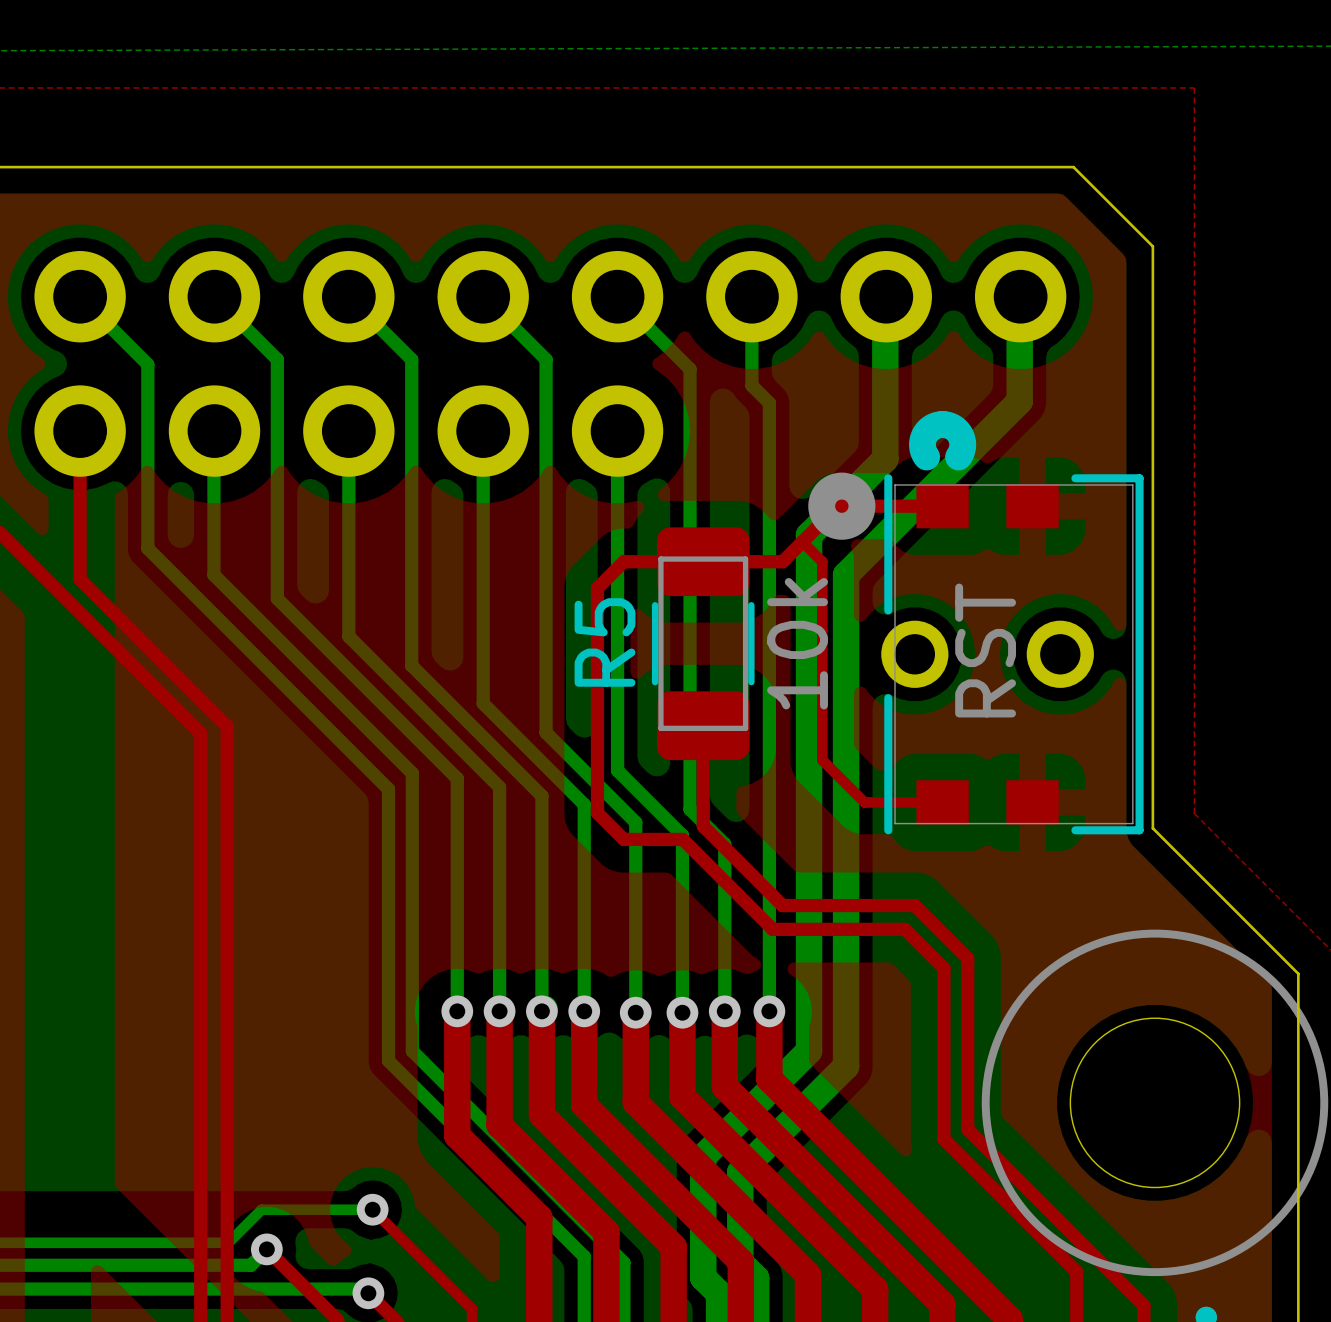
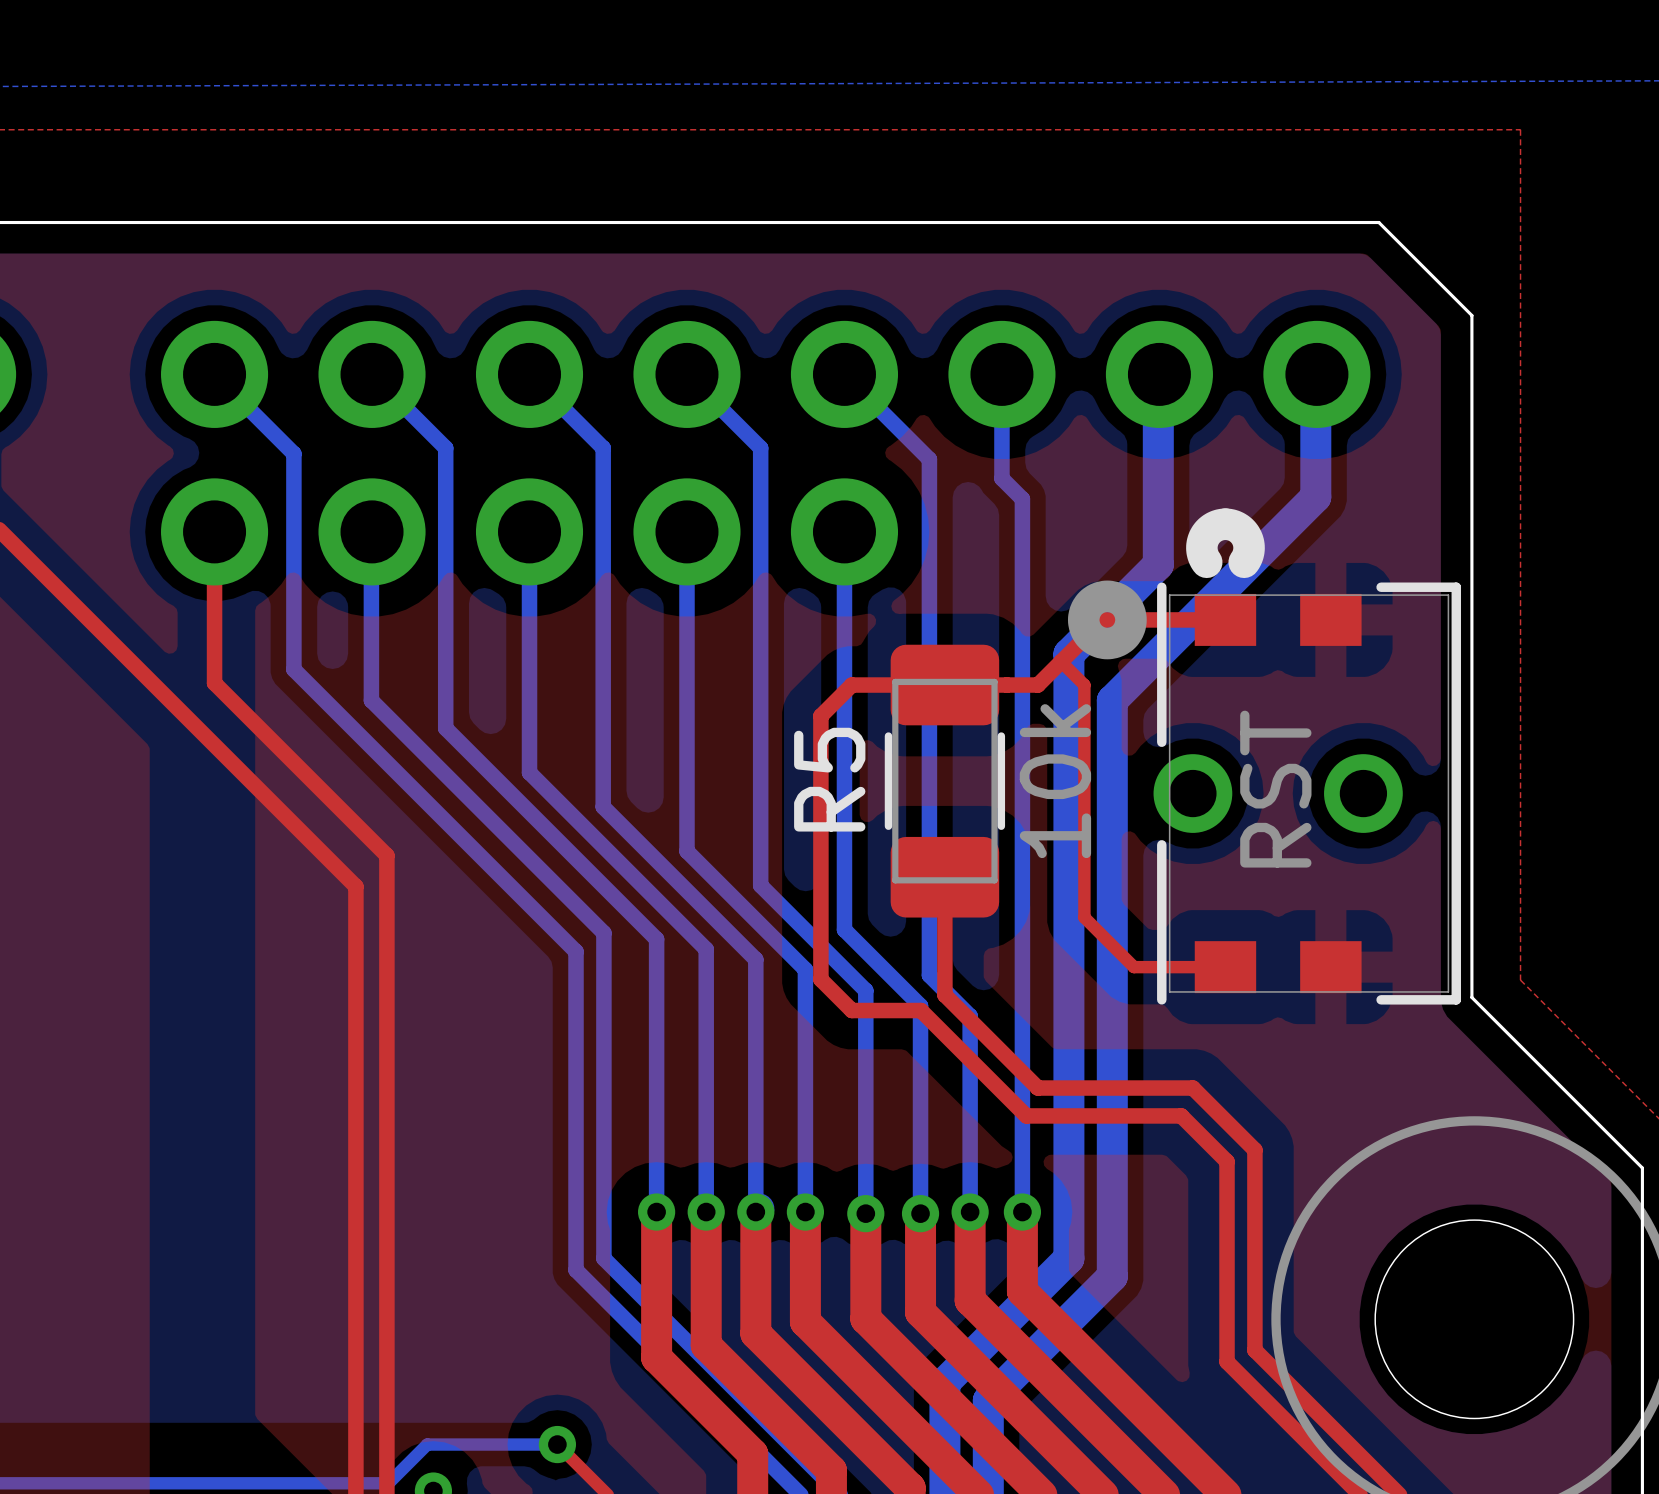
top track: (80, 560) (80, 579) (227, 726) -> (214, 683) (386, 855) (386, 878)

